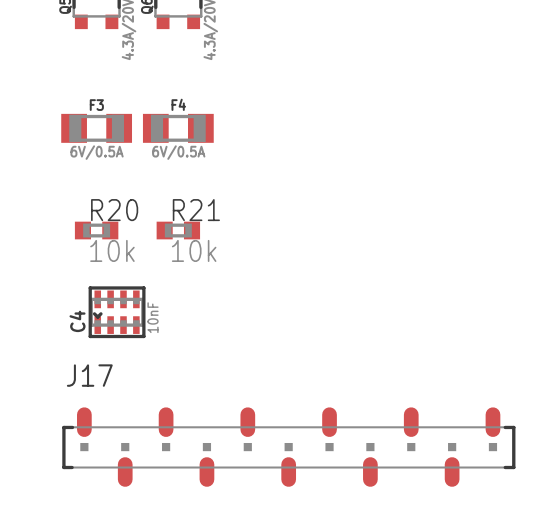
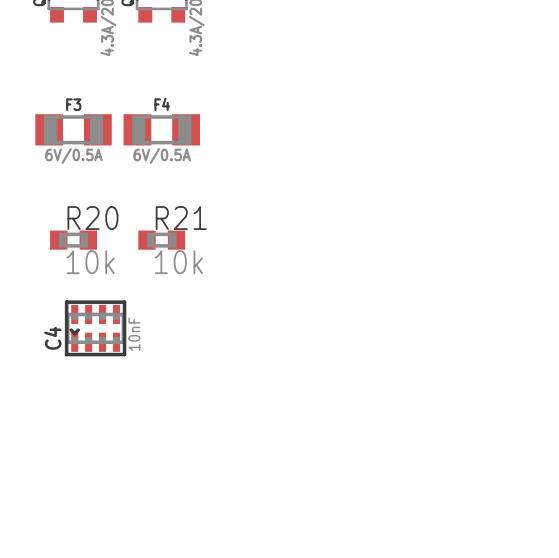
J17: (288, 447) -> none

